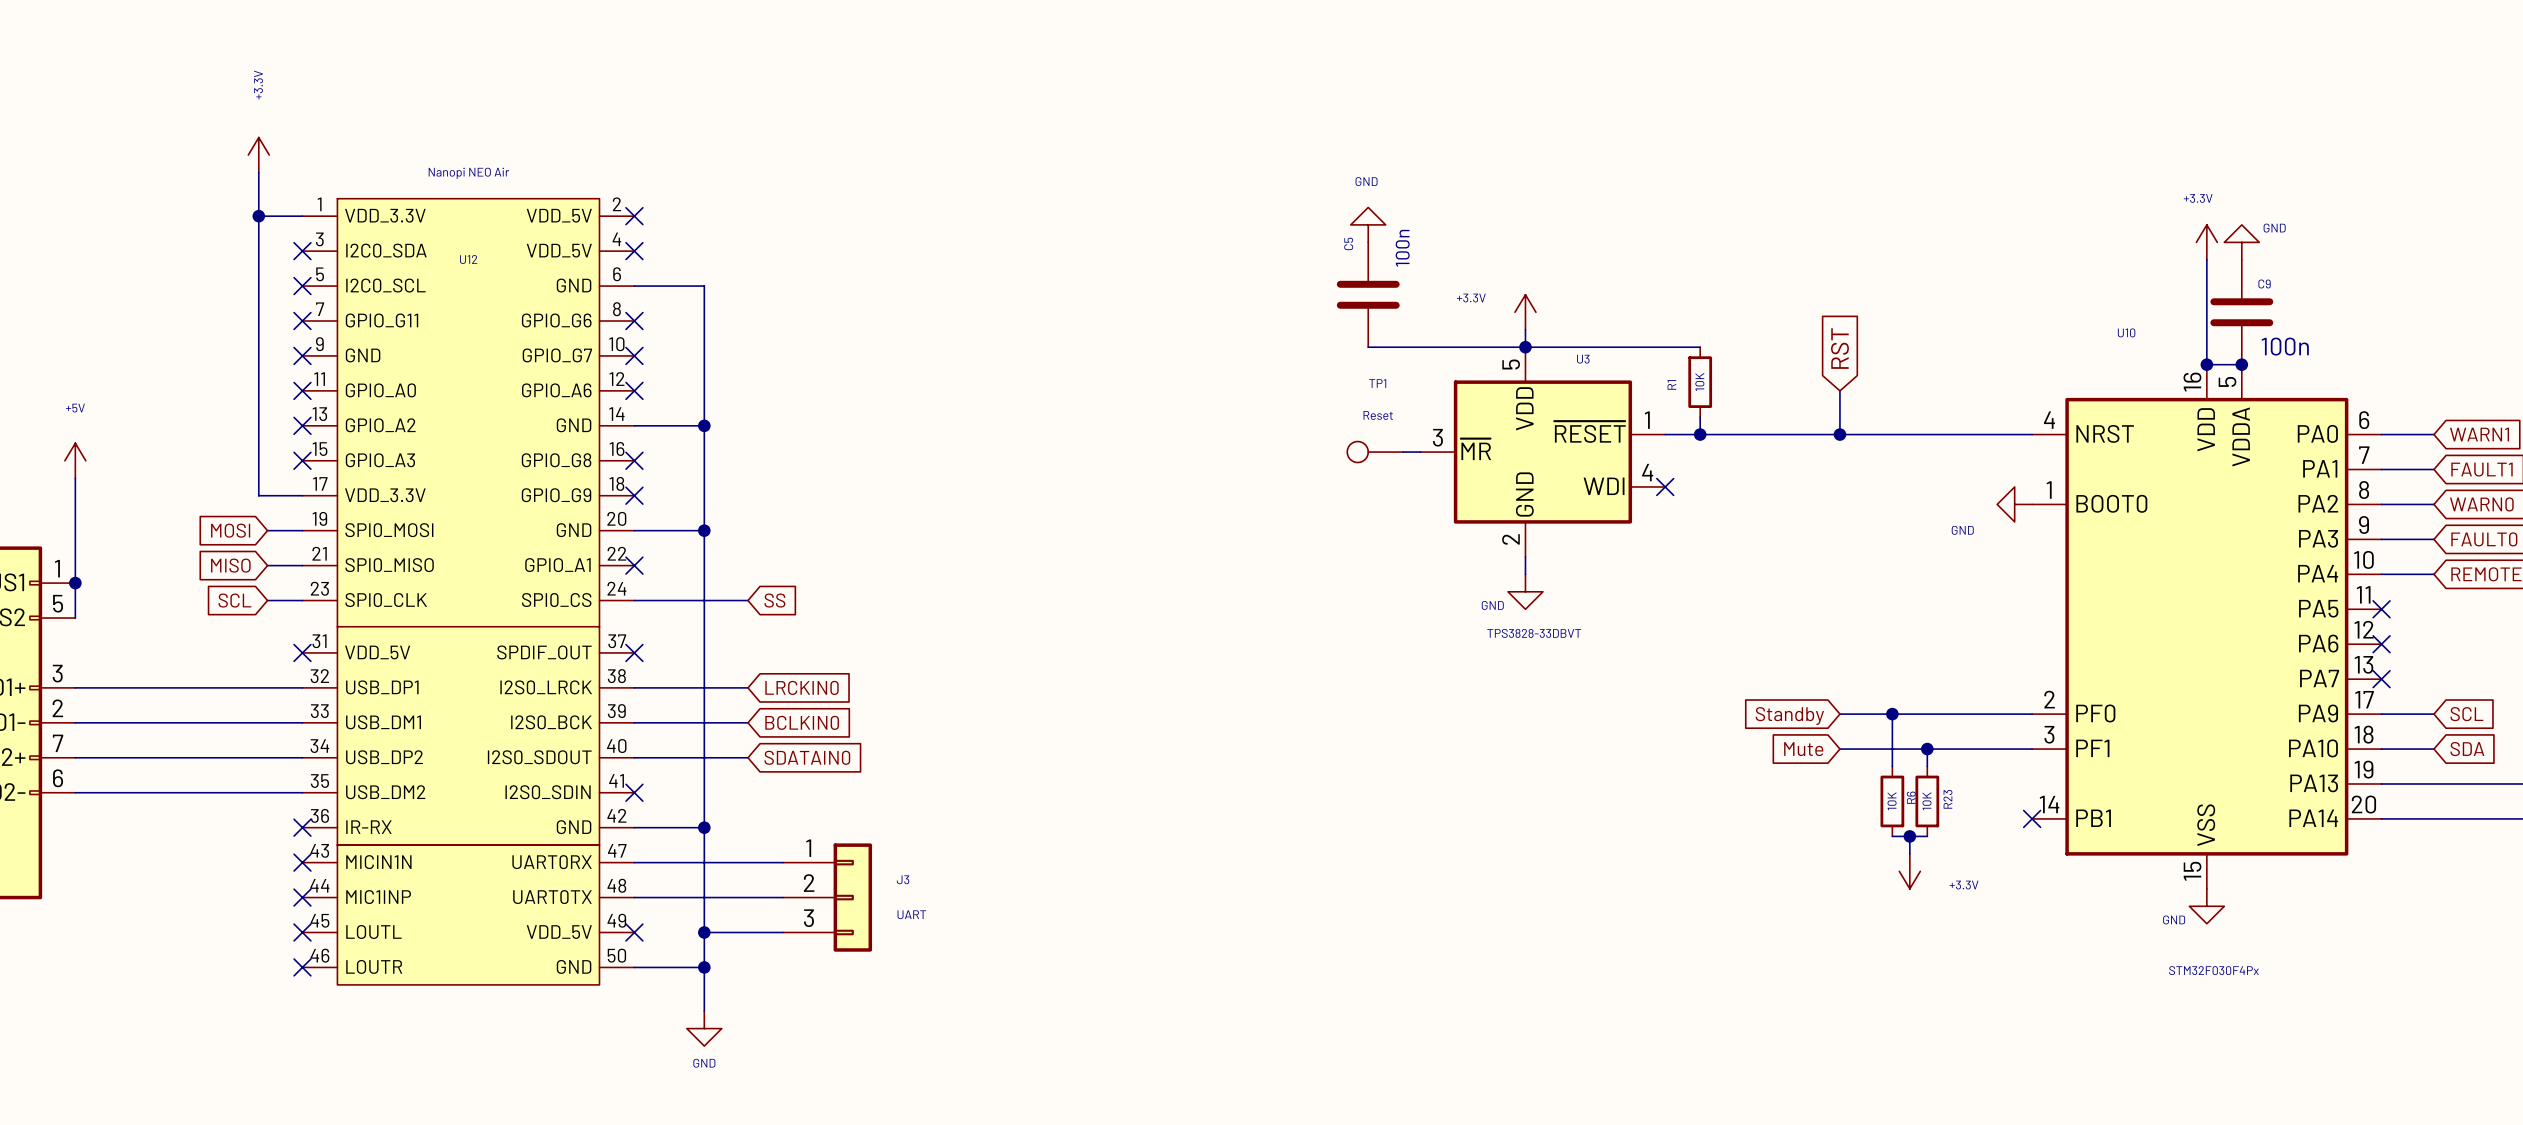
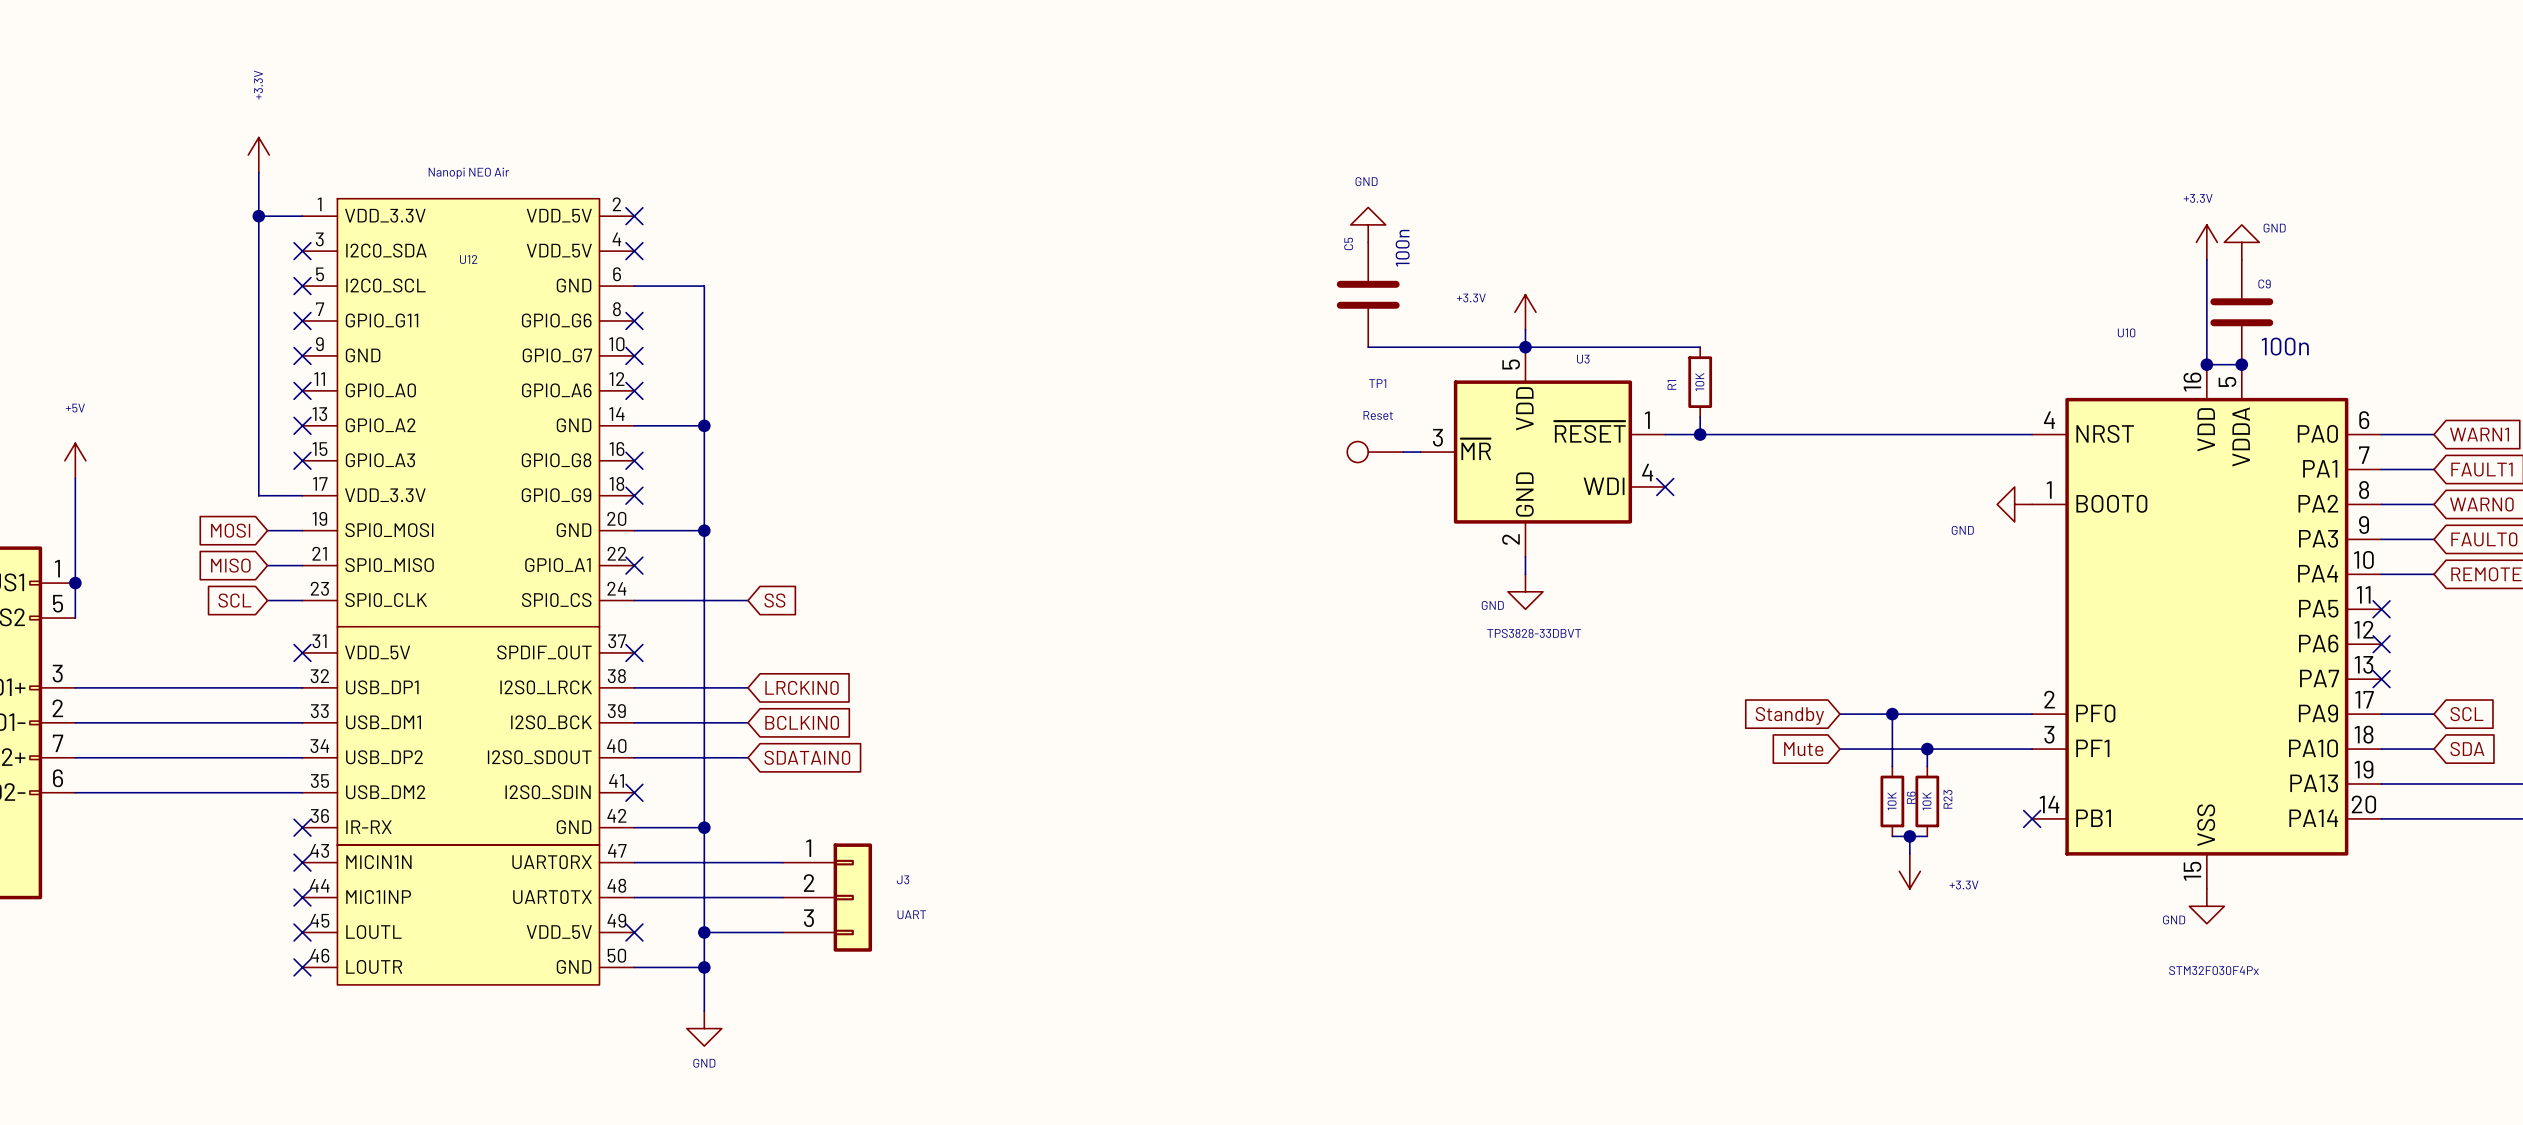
global label: RST (1839, 348) -> none
wire: (1839, 390) (1839, 434) -> none
junction: (1839, 434) -> none

